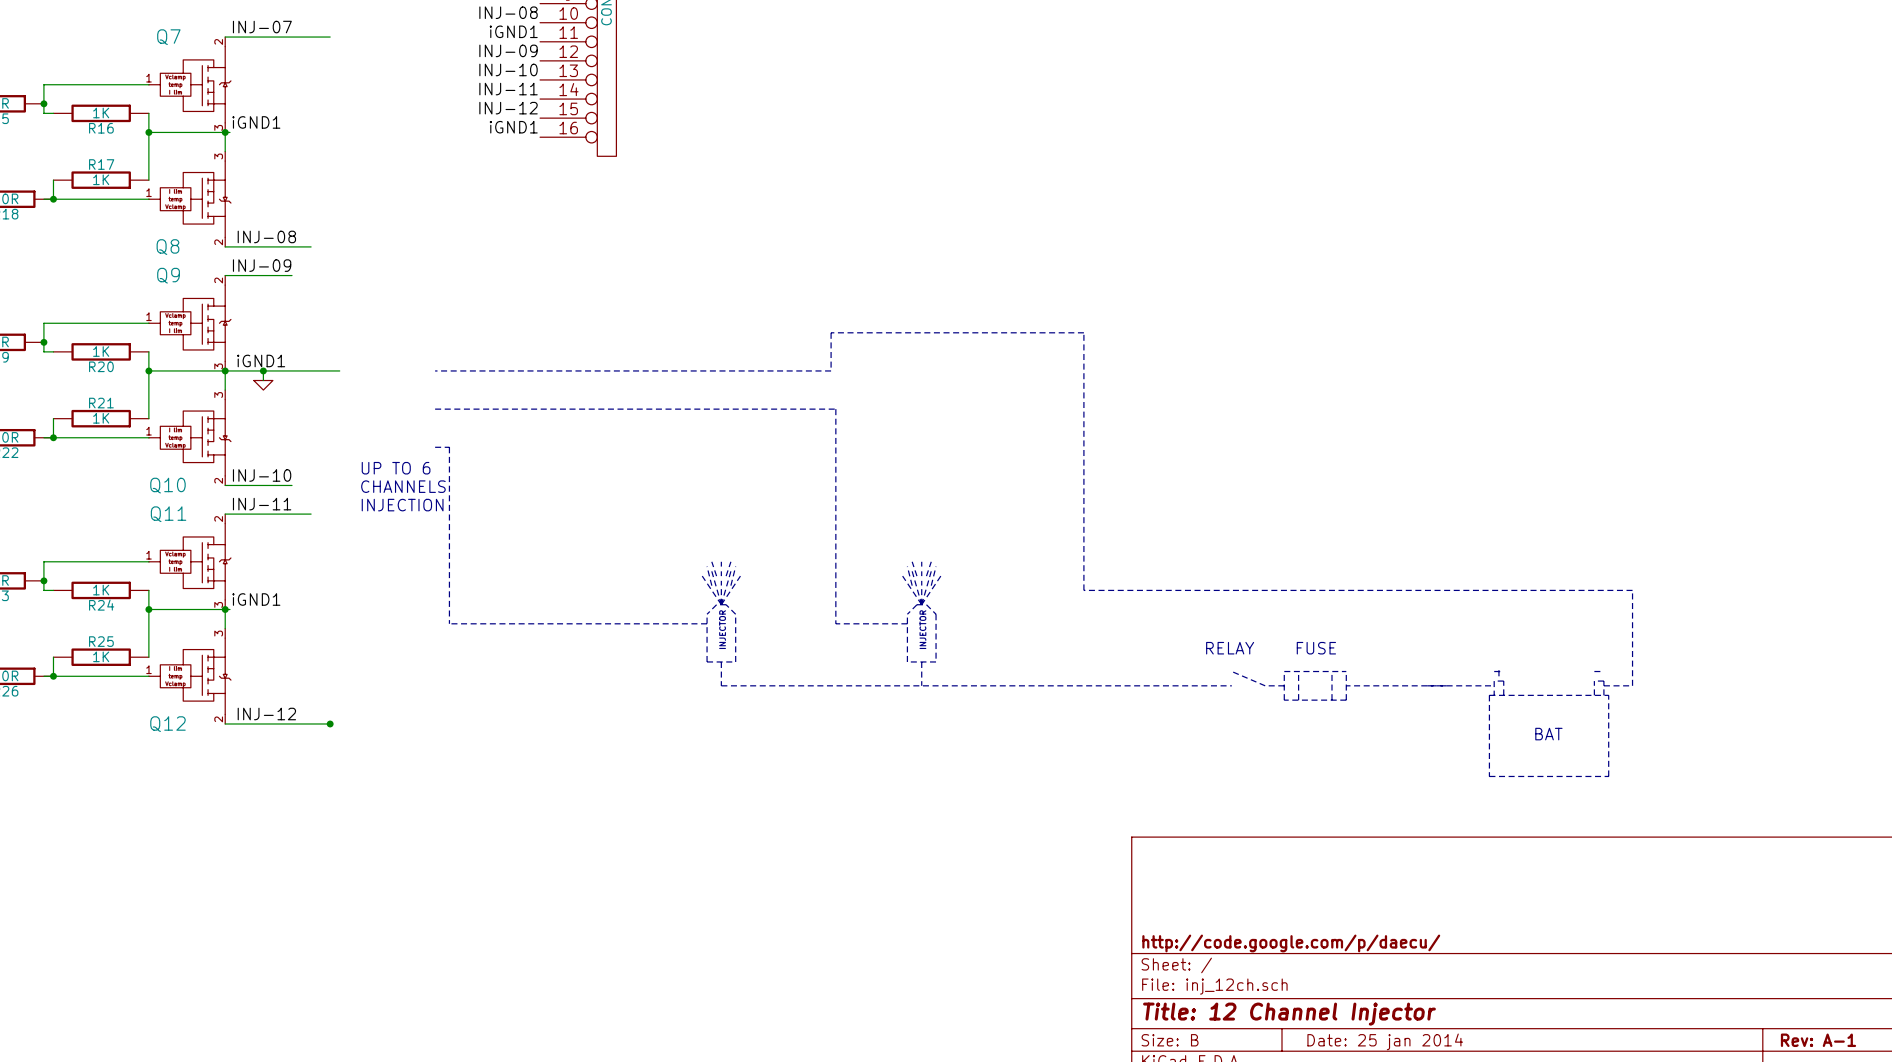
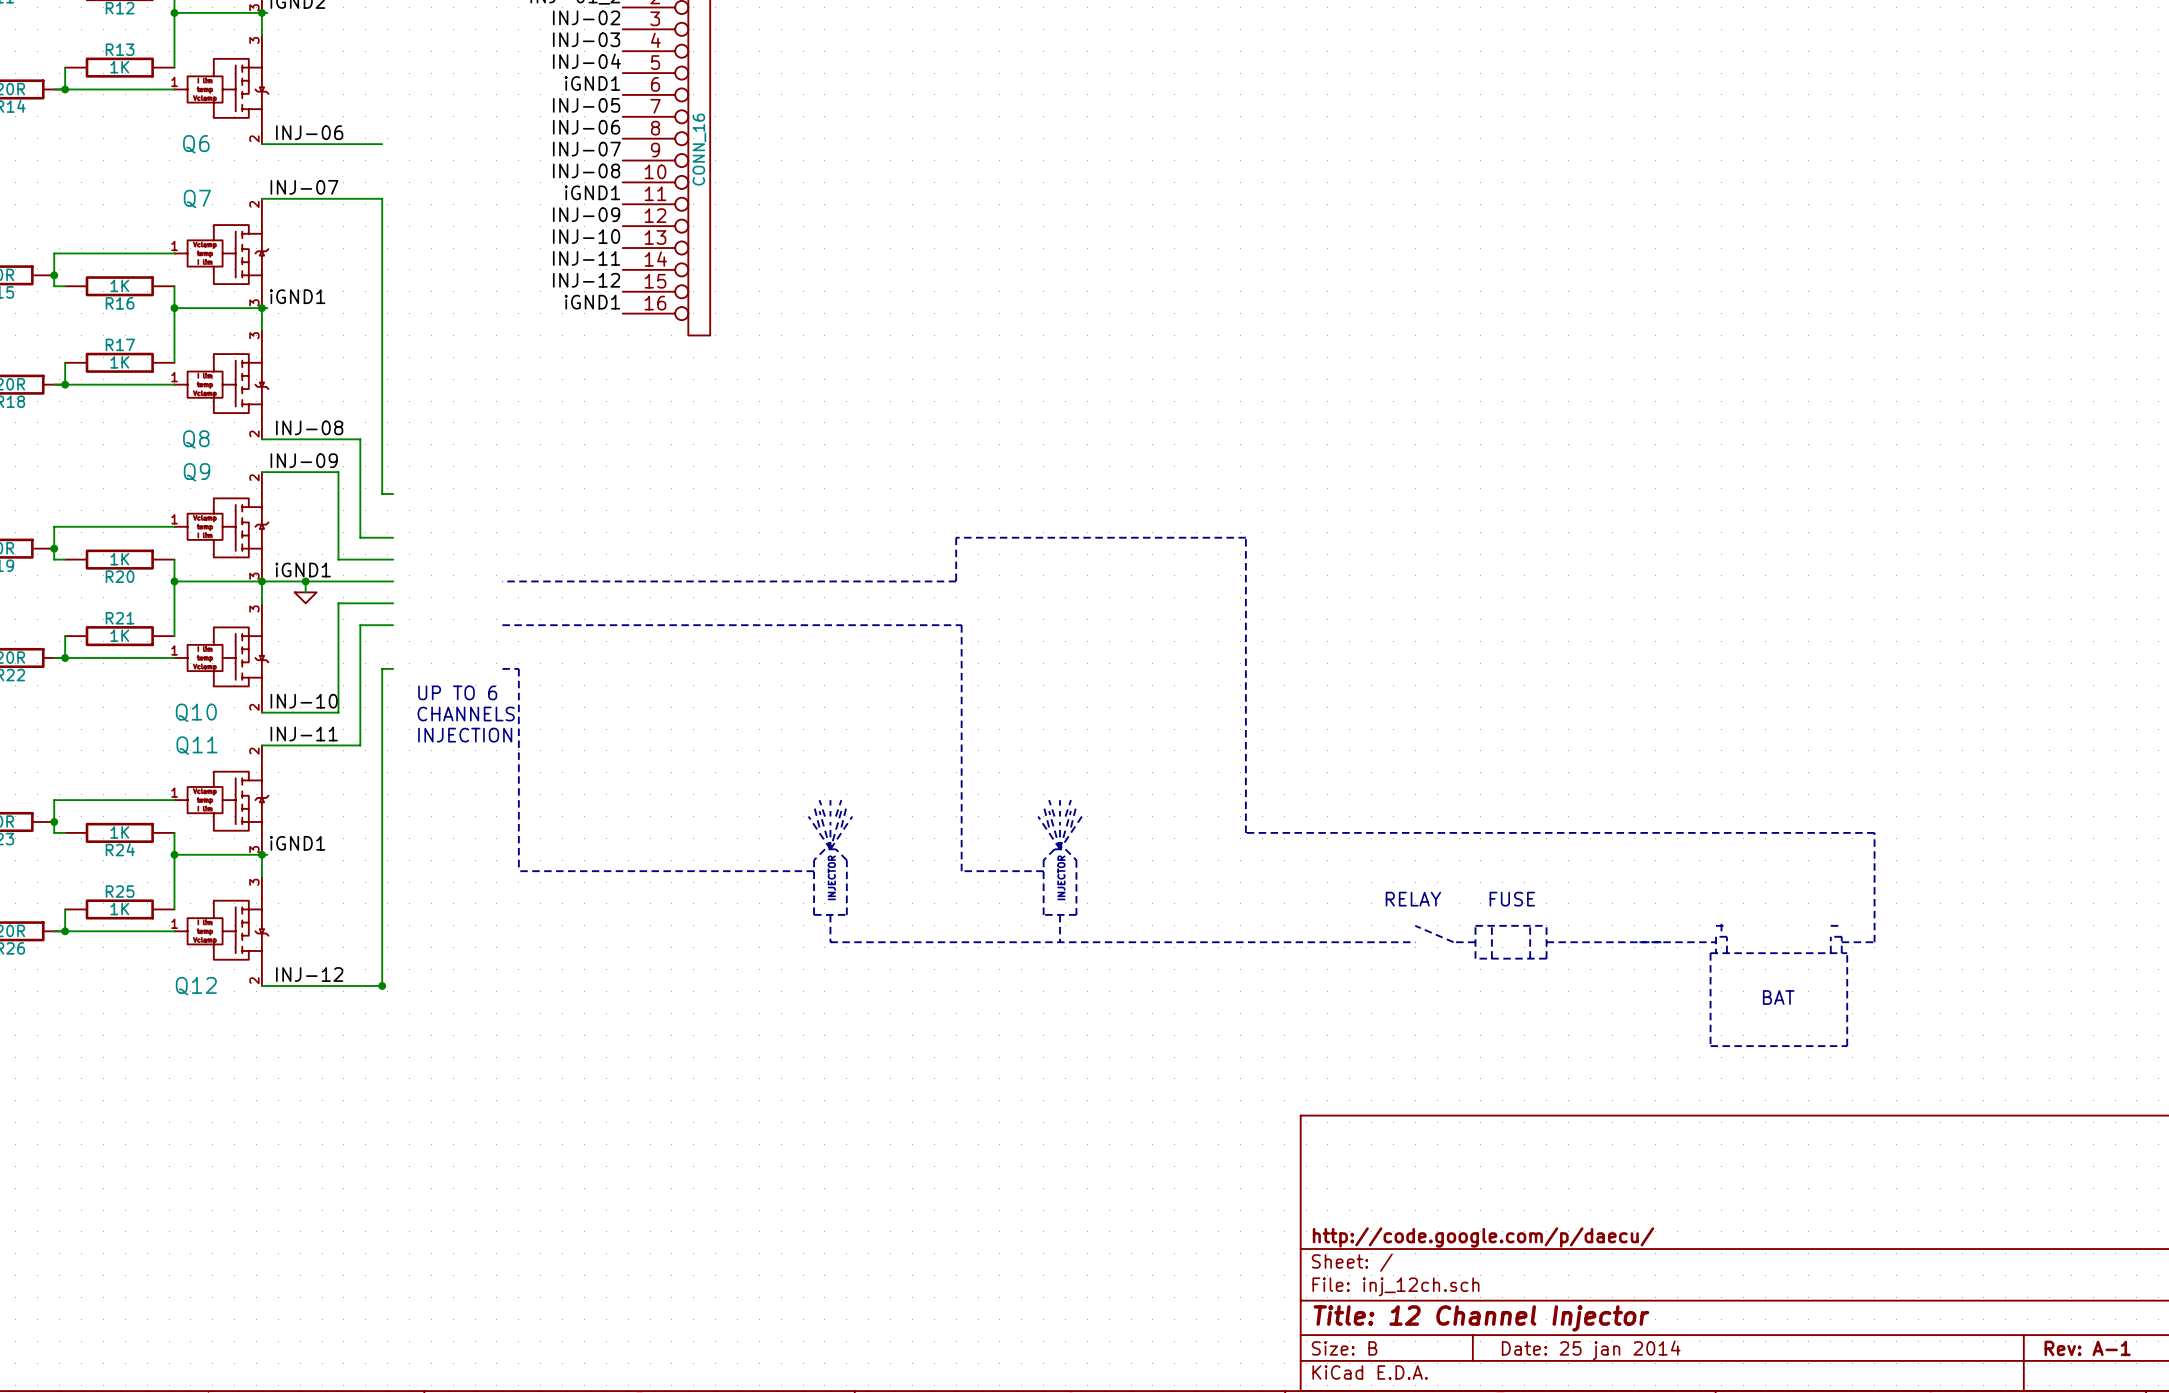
wire: none -> (382, 198) (382, 493) (393, 493)
wire: none -> (360, 439) (360, 537) (393, 537)
wire: none -> (338, 472) (338, 559) (393, 559)
wire: none -> (393, 603) (338, 603) (338, 712)
wire: none -> (393, 625) (360, 625) (360, 745)
wire: none -> (393, 668) (382, 668) (382, 985)

